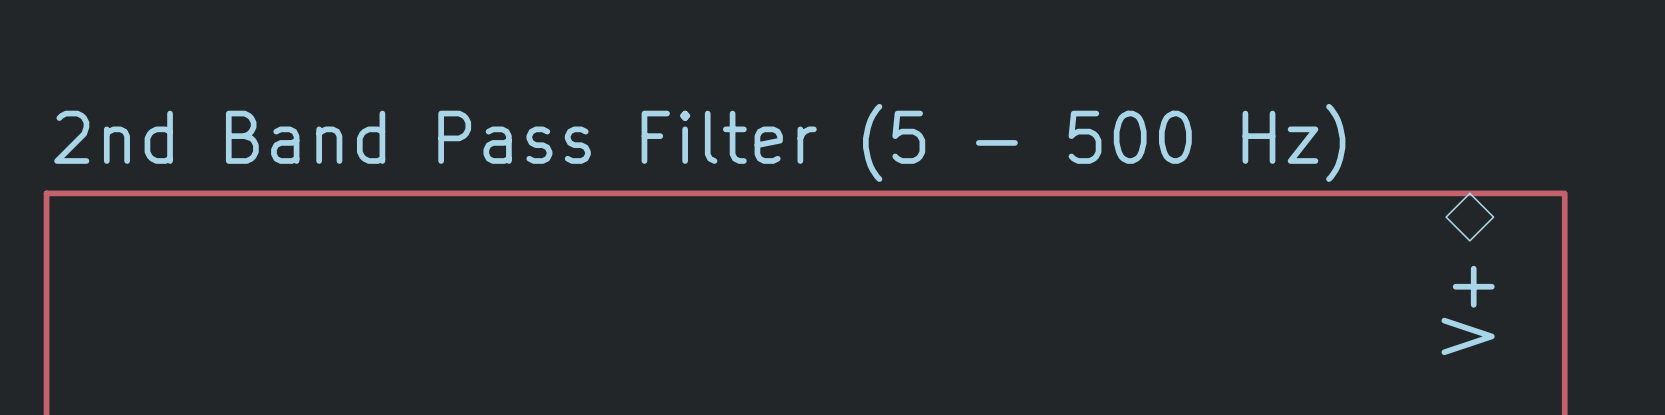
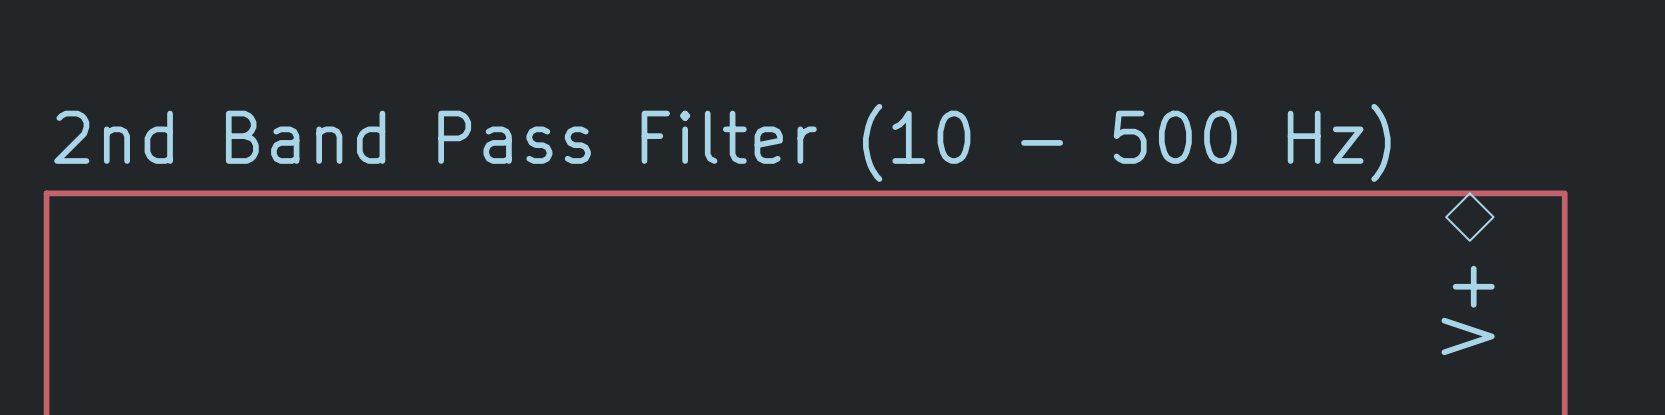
sheet 2nd Band Pass Filter (5 - 500 Hz) name: 2nd Band Pass Filter (5 - 500 Hz) (699, 142) -> 2nd Band Pass Filter (10 - 500 Hz) (722, 142)

